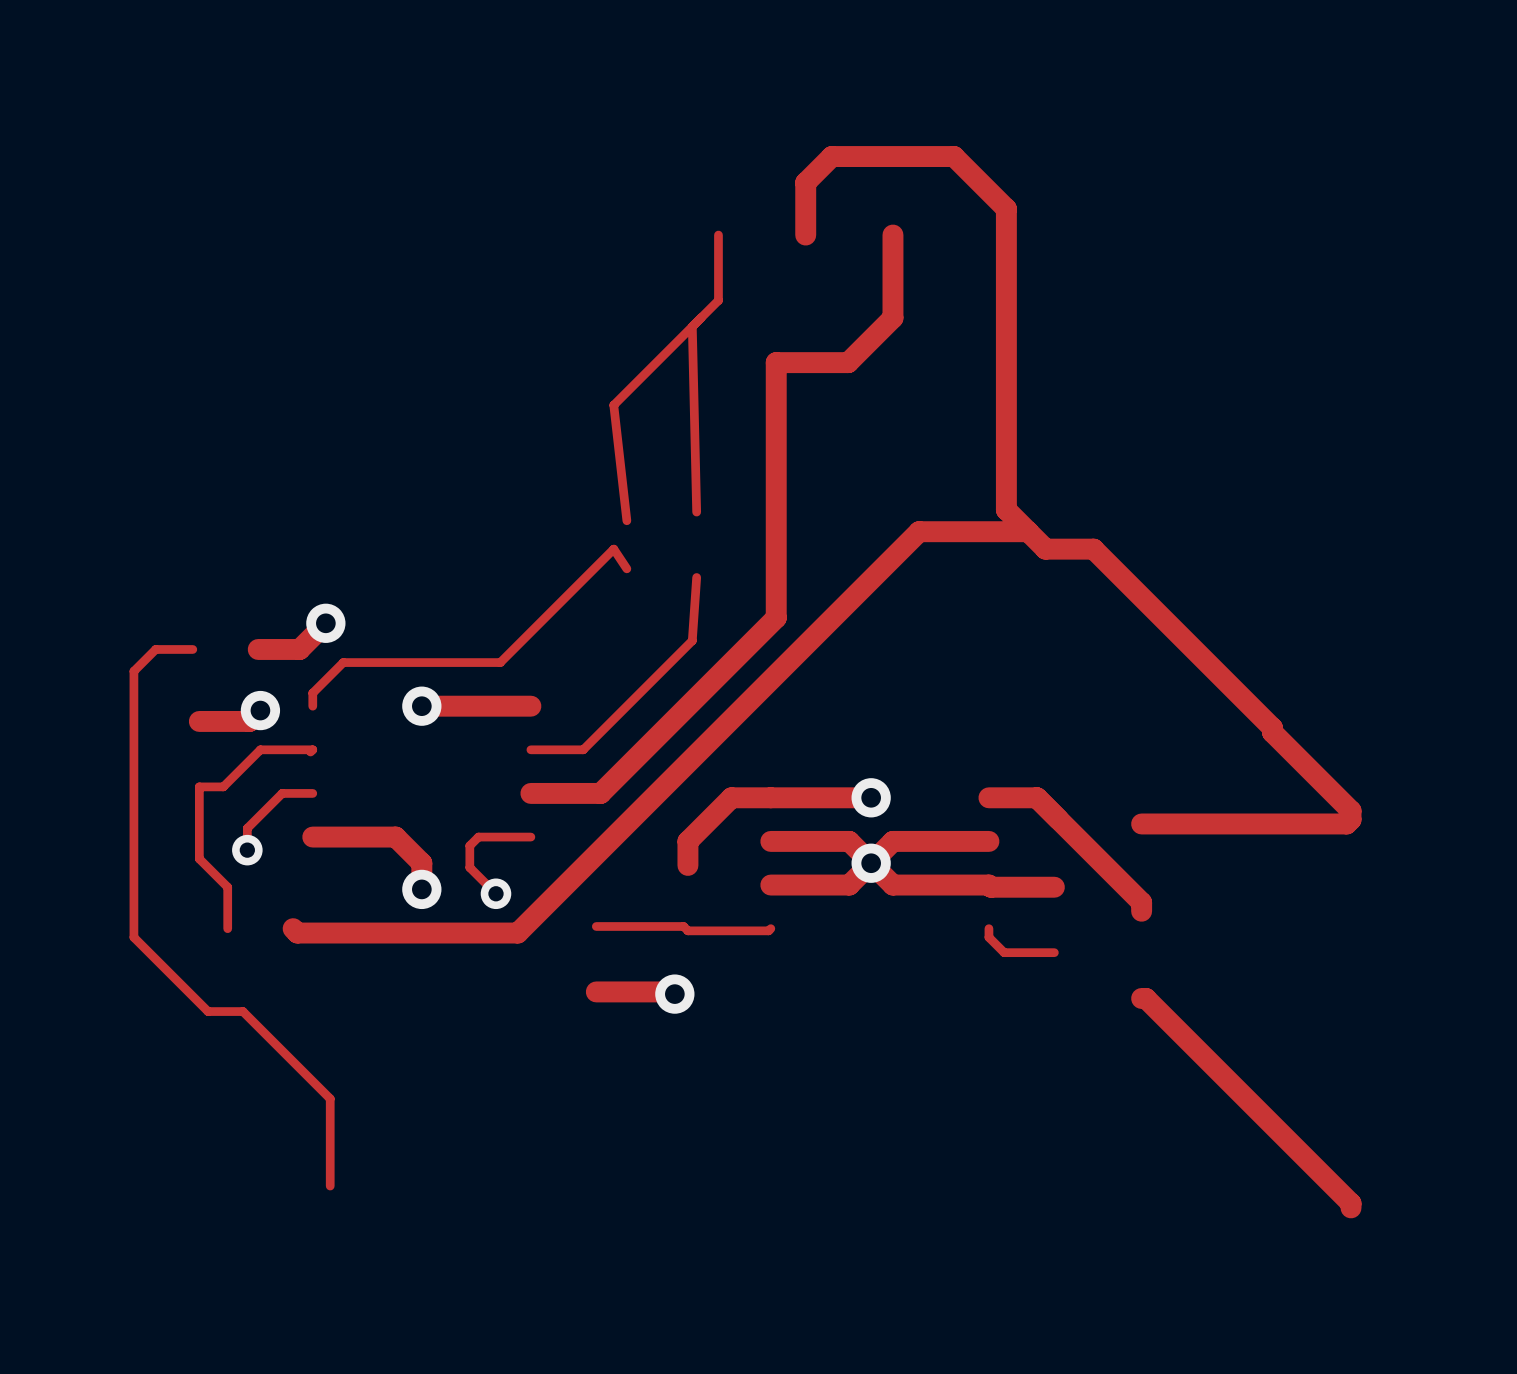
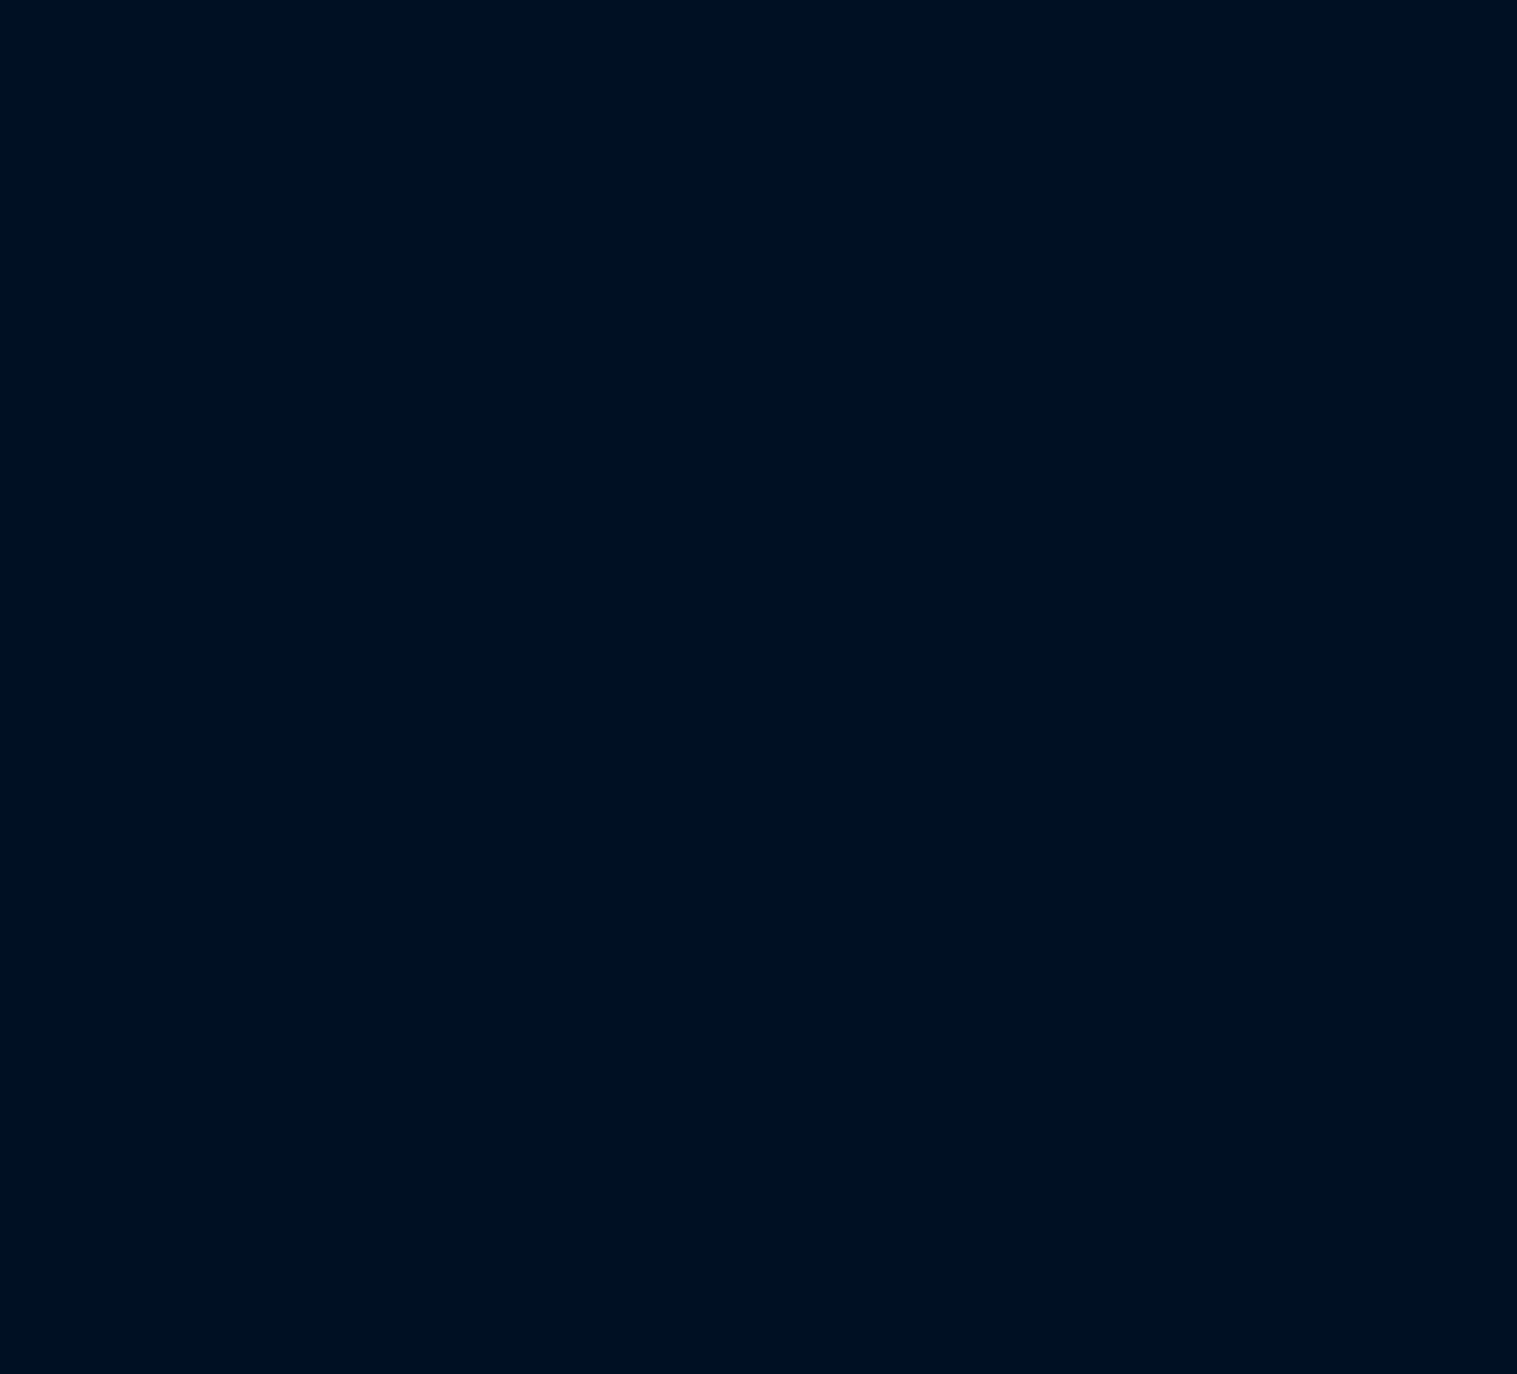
track: (718, 235) (718, 300) (613, 405) (626, 520) -> none
track: (805, 235) (805, 182) (831, 156) (954, 156) (1006, 208) (1006, 509) (1045, 549) (1093, 549) (1272, 728) (1272, 732) (1351, 810) (1351, 819) (1346, 823) (1141, 823) -> none
track: (892, 235) (892, 317) (848, 362) (776, 362) (776, 617) (600, 793) (530, 793) -> none
track: (692, 326) (696, 512) -> none
track: (1028, 531) (919, 531) (517, 933) (297, 933) (293, 928) -> none
track: (626, 568) (613, 549) (500, 662) (343, 662) (312, 693) (312, 706) -> none
track: (696, 577) (692, 640) (583, 749) (530, 749) -> none
track: (325, 623) (299, 649) (258, 649) -> none
via: (325, 623) -> none
track: (192, 649) (155, 649) (133, 671) (133, 937) (208, 1011) (242, 1011) (330, 1098) (330, 1186) -> none
track: (421, 706) (530, 706) -> none
via: (421, 706) -> none
track: (260, 710) (249, 721) (199, 721) -> none
via: (260, 710) -> none
track: (310, 751) (312, 749) (260, 749) (223, 786) (199, 786) (199, 858) (227, 887) (227, 928) -> none
track: (312, 793) (282, 793) (247, 828) (247, 850) -> none
track: (871, 797) (731, 797) (687, 841) (687, 865) -> none
via: (871, 797) -> none
track: (988, 797) (1036, 797) (1141, 902) (1141, 911) -> none
track: (312, 837) (395, 837) (421, 863) (421, 889) -> none
track: (530, 837) (478, 837) (469, 845) (469, 867) (495, 893) -> none
track: (770, 841) (849, 841) (892, 885) (1054, 887) -> none
track: (988, 841) (892, 841) (849, 885) (770, 885) -> none
via: (247, 850) -> none
via: (871, 863) -> none
via: (421, 889) -> none
via: (495, 893) -> none
track: (596, 926) (683, 926) (687, 930) (768, 930) (770, 928) -> none
track: (988, 928) (988, 937) (1004, 952) (1054, 952) -> none
track: (596, 991) (672, 991) (674, 994) -> none
via: (674, 994) -> none
track: (1141, 998) (1145, 998) (1351, 1203) (1351, 1207) -> none

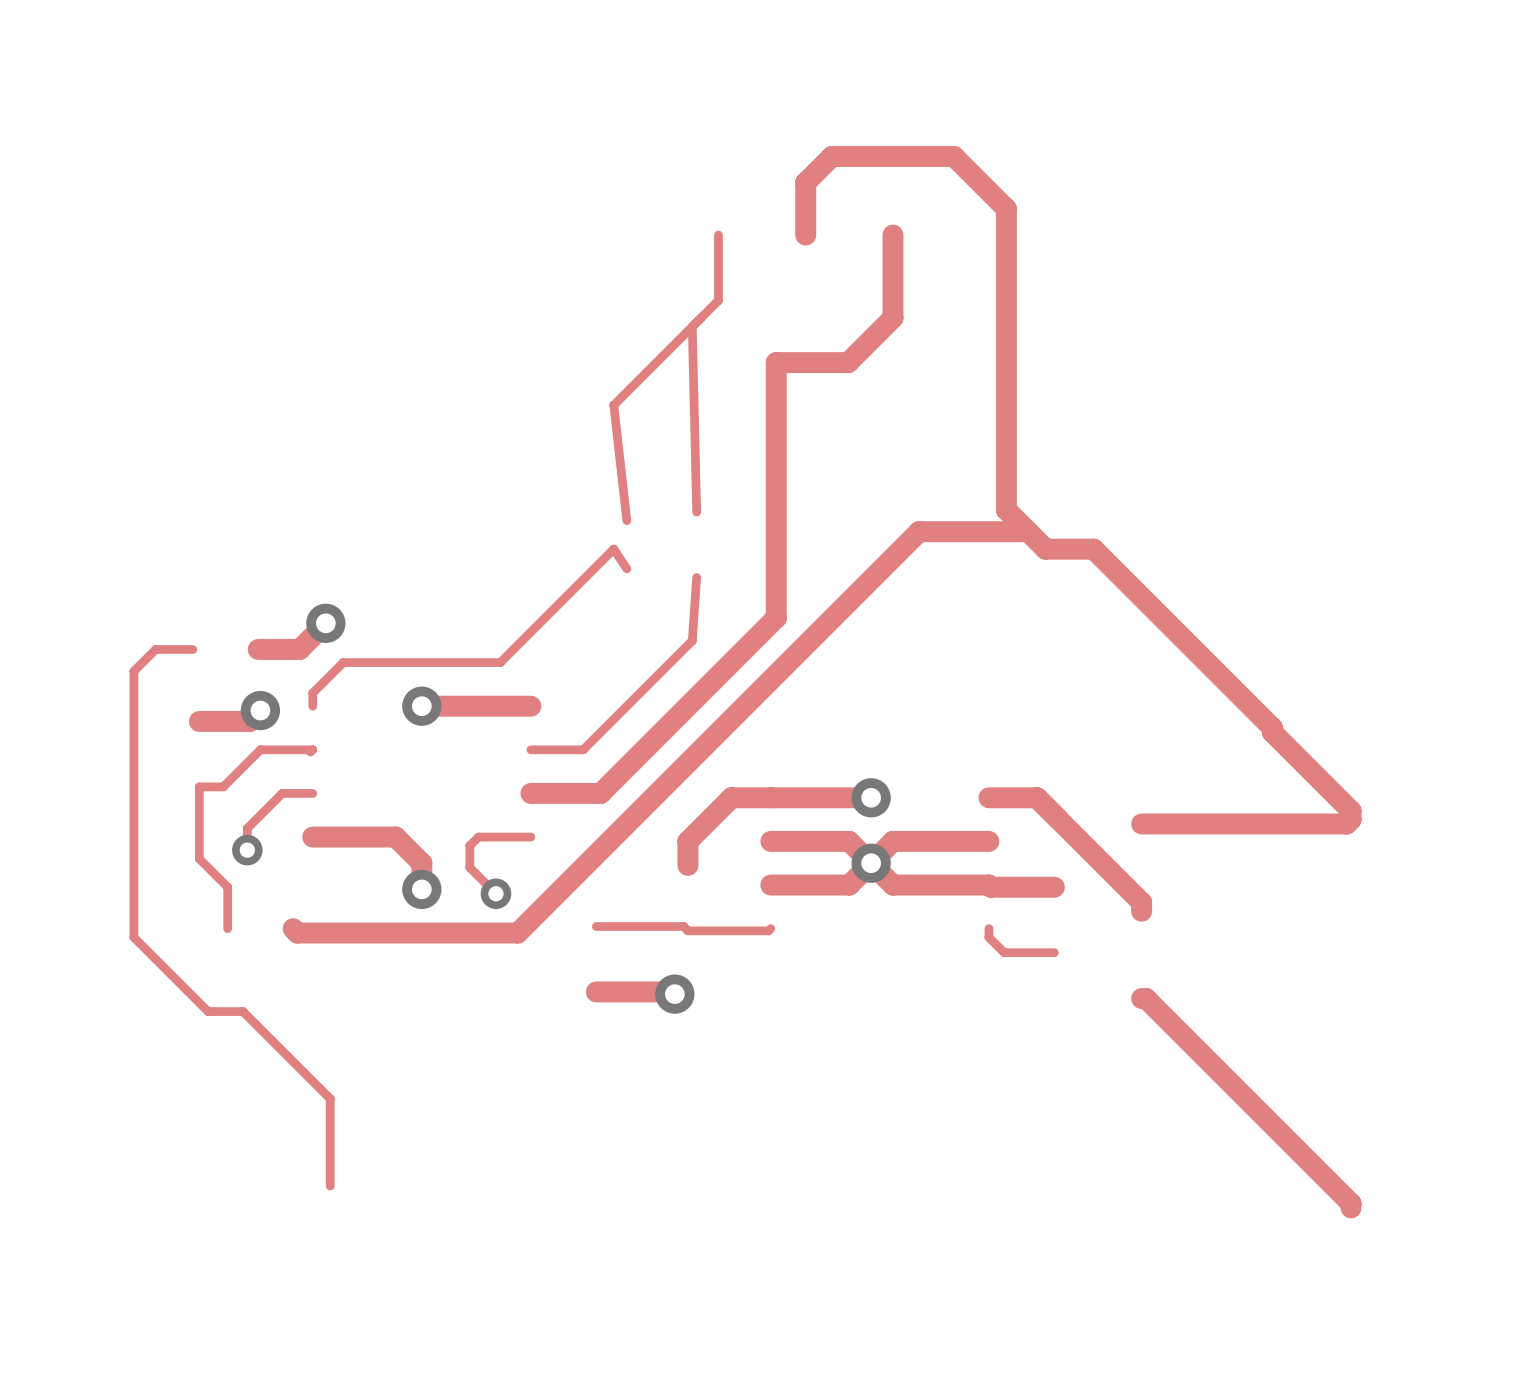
track: none -> (718, 235) (718, 300) (613, 405) (626, 520)
track: none -> (805, 235) (805, 182) (831, 156) (954, 156) (1006, 208) (1006, 509) (1045, 549) (1093, 549) (1272, 728) (1272, 732) (1351, 810) (1351, 819) (1346, 823) (1141, 823)
track: none -> (892, 235) (892, 317) (848, 362) (776, 362) (776, 617) (600, 793) (530, 793)
track: none -> (692, 326) (696, 512)
track: none -> (1028, 531) (919, 531) (517, 933) (297, 933) (293, 928)
track: none -> (626, 568) (613, 549) (500, 662) (343, 662) (312, 693) (312, 706)
track: none -> (696, 577) (692, 640) (583, 749) (530, 749)
track: none -> (325, 623) (299, 649) (258, 649)
via: none -> (325, 623)
track: none -> (192, 649) (155, 649) (133, 671) (133, 937) (208, 1011) (242, 1011) (330, 1098) (330, 1186)
track: none -> (421, 706) (530, 706)
via: none -> (421, 706)
track: none -> (260, 710) (249, 721) (199, 721)
via: none -> (260, 710)
track: none -> (310, 751) (312, 749) (260, 749) (223, 786) (199, 786) (199, 858) (227, 887) (227, 928)
track: none -> (312, 793) (282, 793) (247, 828) (247, 850)
track: none -> (871, 797) (731, 797) (687, 841) (687, 865)
via: none -> (871, 797)
track: none -> (988, 797) (1036, 797) (1141, 902) (1141, 911)
track: none -> (312, 837) (395, 837) (421, 863) (421, 889)
track: none -> (530, 837) (478, 837) (469, 845) (469, 867) (495, 893)
track: none -> (770, 841) (849, 841) (892, 885) (1054, 887)
track: none -> (988, 841) (892, 841) (849, 885) (770, 885)
via: none -> (247, 850)
via: none -> (871, 863)
via: none -> (421, 889)
via: none -> (495, 893)
track: none -> (596, 926) (683, 926) (687, 930) (768, 930) (770, 928)
track: none -> (988, 928) (988, 937) (1004, 952) (1054, 952)
track: none -> (596, 991) (672, 991) (674, 994)
via: none -> (674, 994)
track: none -> (1141, 998) (1145, 998) (1351, 1203) (1351, 1207)

